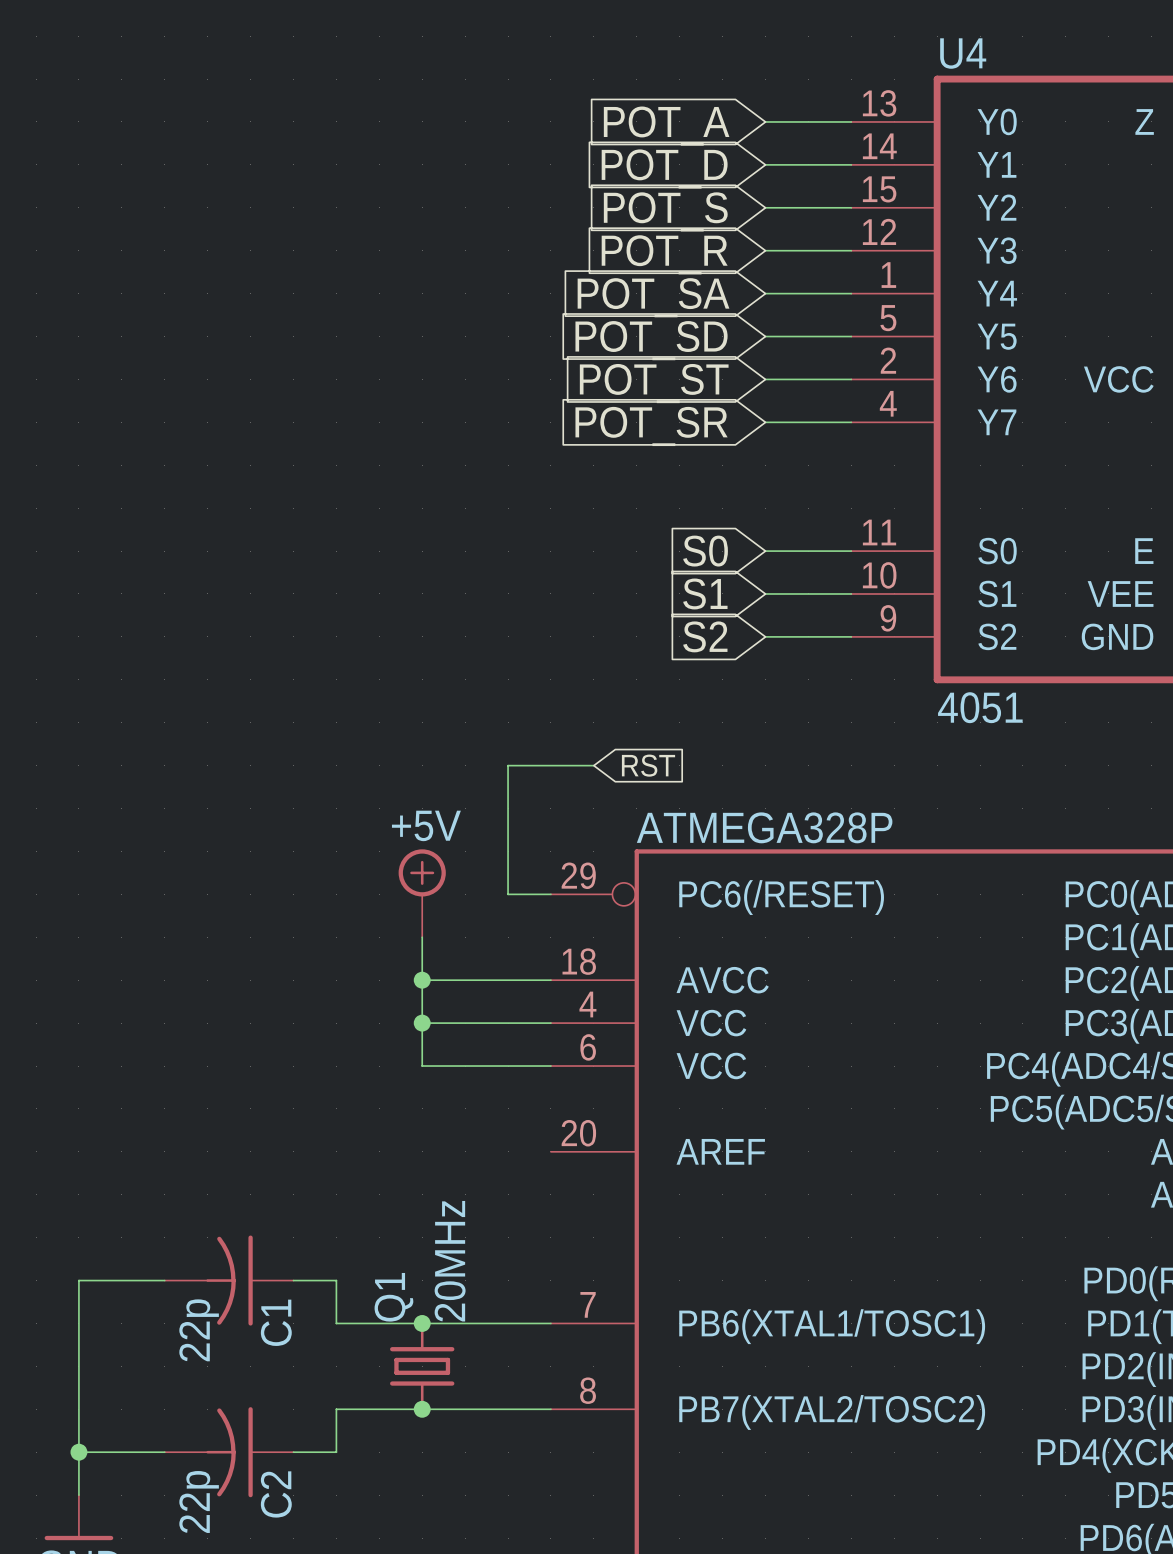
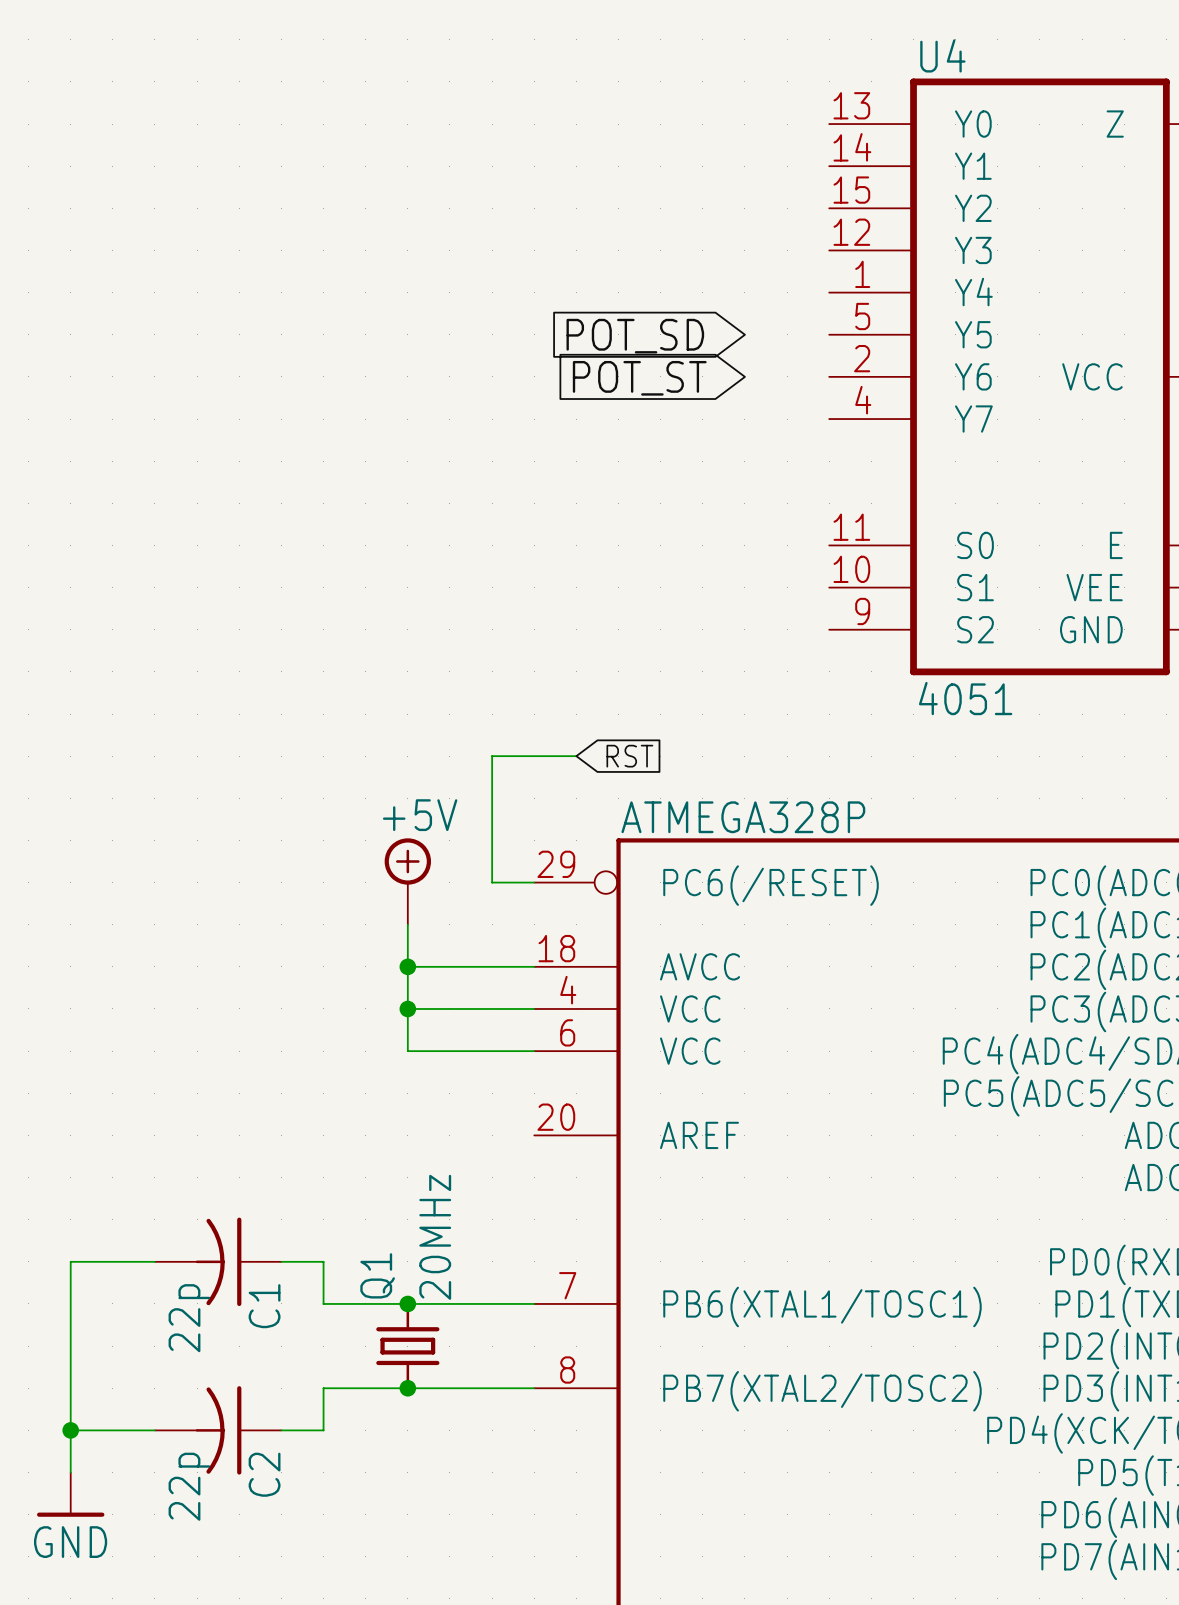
wire: (765, 121) (851, 121) -> none
global label: POT_A (666, 126) -> none
wire: (765, 164) (851, 164) -> none
global label: POT_D (664, 169) -> none
wire: (765, 207) (851, 207) -> none
global label: POT_S (665, 211) -> none
wire: (765, 250) (851, 250) -> none
global label: POT_R (664, 254) -> none
wire: (765, 293) (851, 293) -> none
global label: POT_SA (653, 297) -> none
wire: (765, 336) (851, 336) -> none
wire: (765, 379) (851, 379) -> none
wire: (765, 422) (851, 422) -> none
global label: POT_SR (651, 426) -> none
global label: S0 (705, 551) -> none
wire: (765, 551) (851, 551) -> none
global label: S1 (705, 593) -> none
wire: (765, 593) (851, 593) -> none
global label: S2 (705, 636) -> none
wire: (765, 636) (851, 636) -> none

